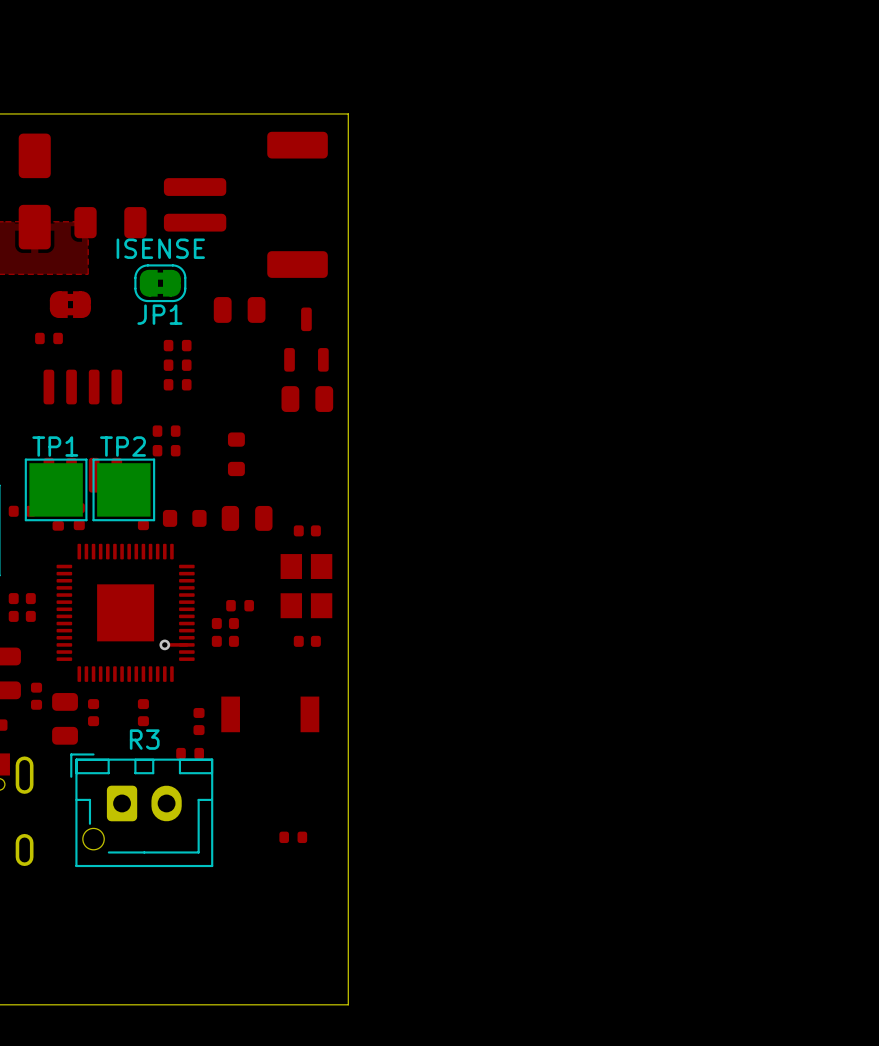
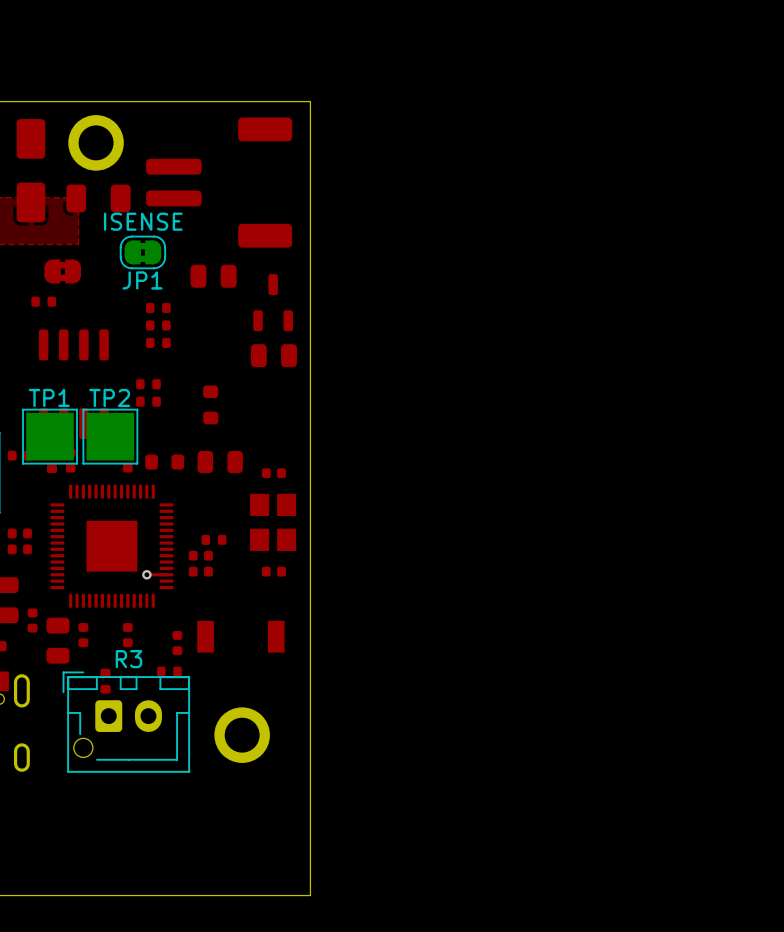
part: none -> (96, 142)
part: none -> (242, 735)
part rotation: 0° (293, 837) -> 90° clockwise (105, 681)
part position: (293, 837) -> (105, 681)

